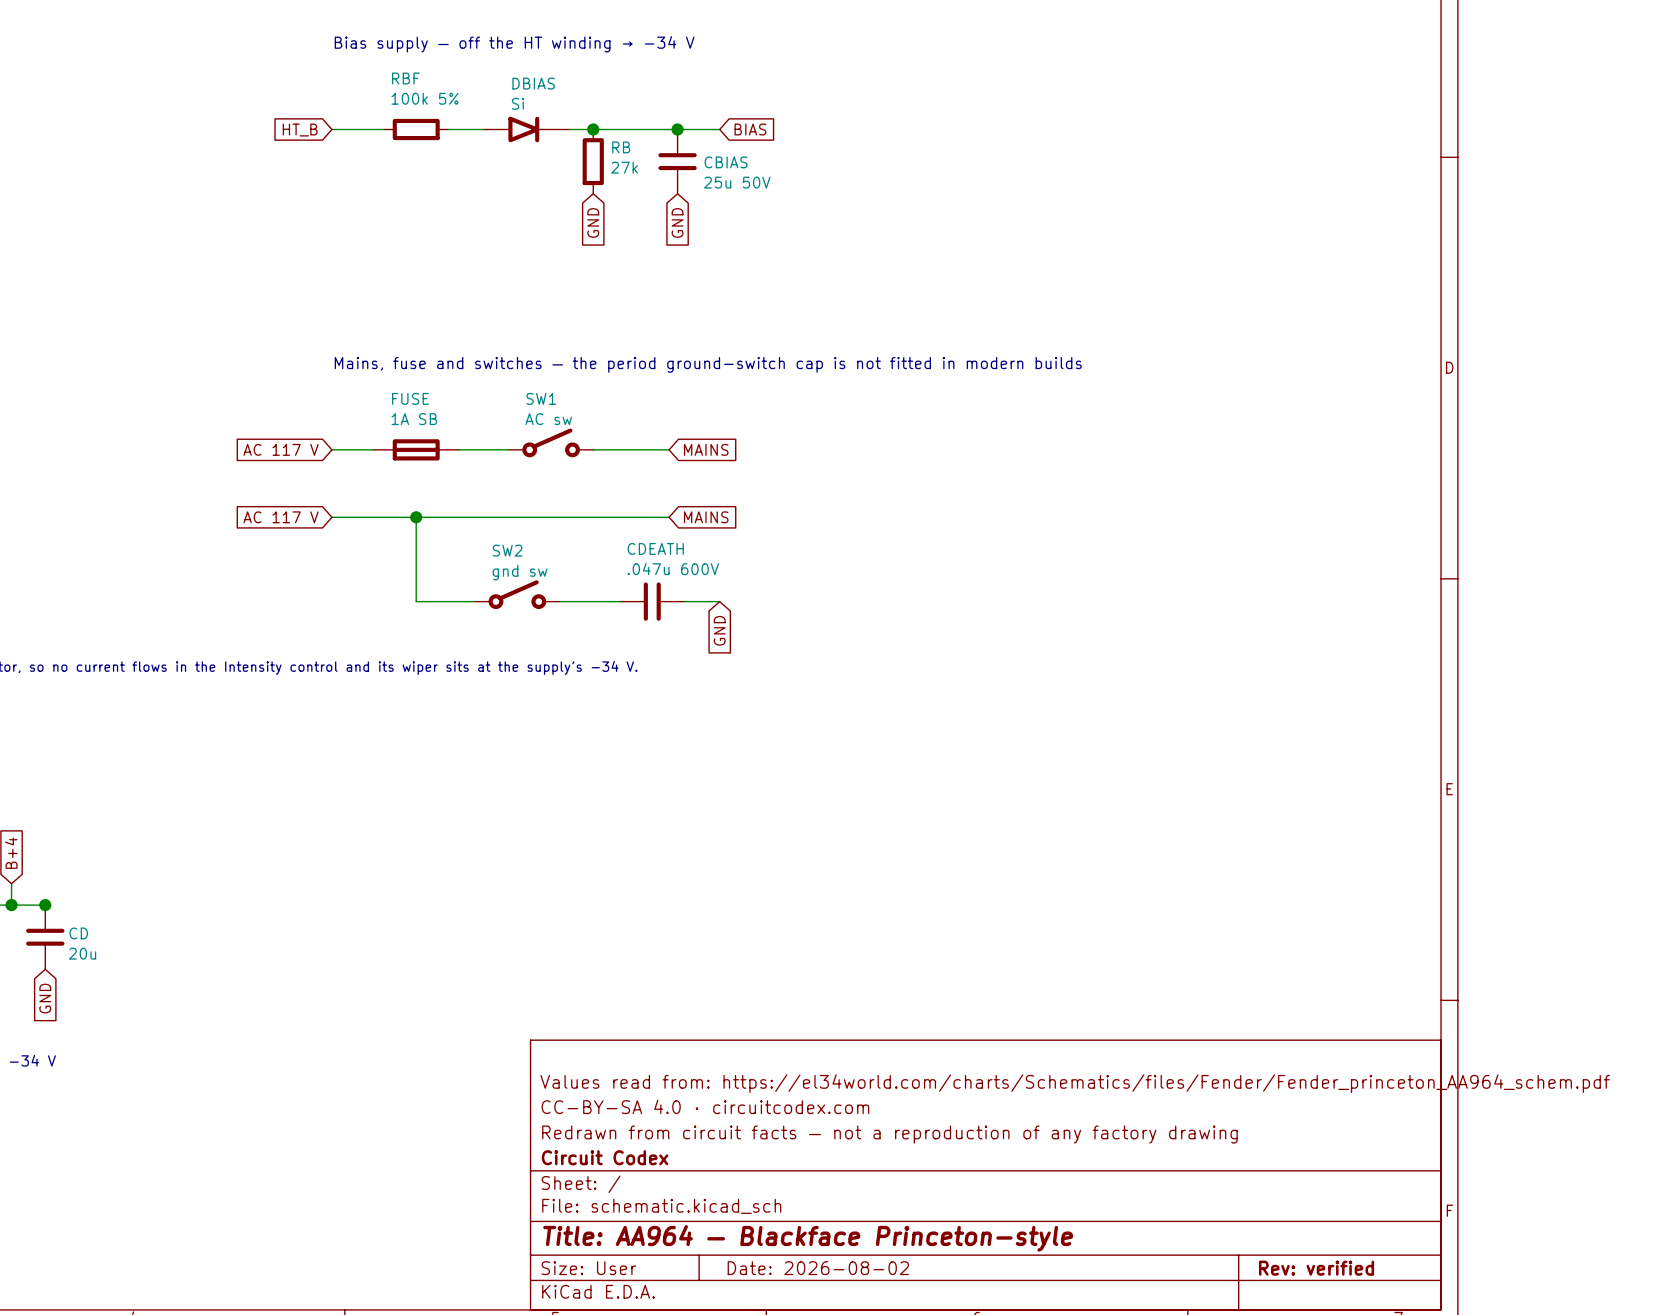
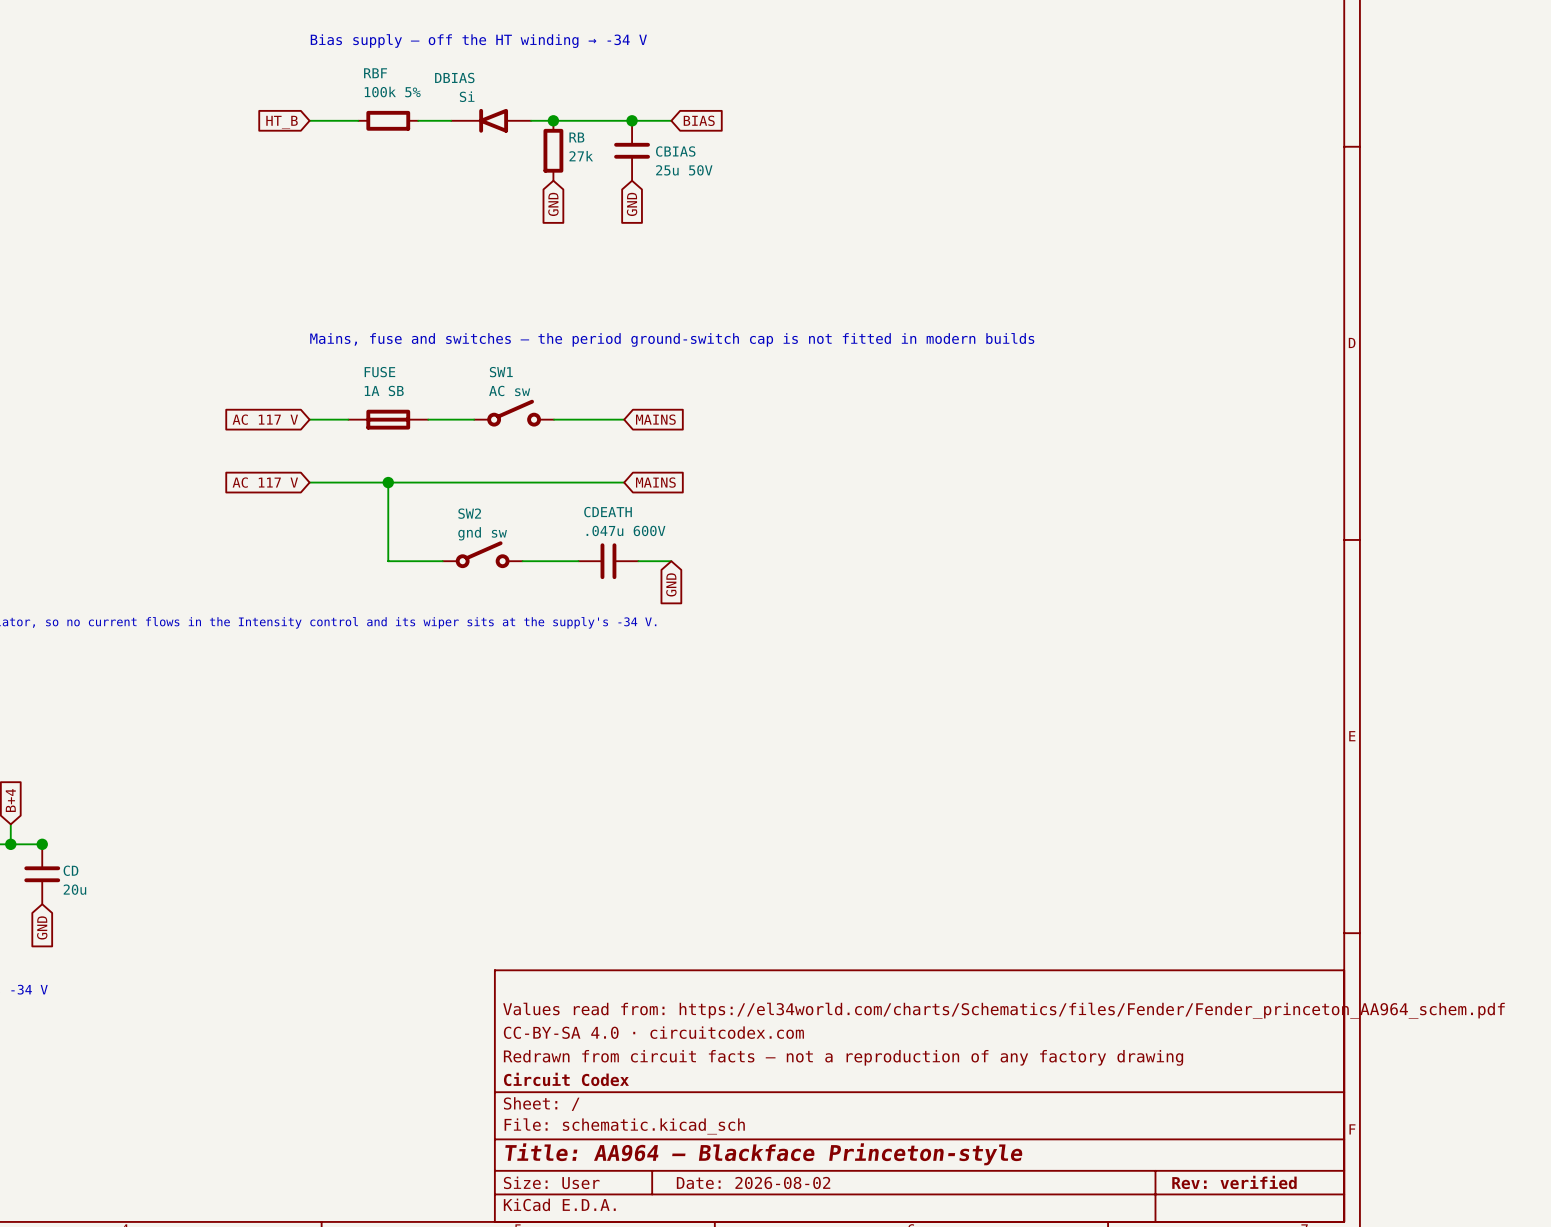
DBIAS name position: DBIAS (533, 83) -> DBIAS (454, 77)
DBIAS value position: Si (518, 103) -> Si (467, 96)
DBIAS rotation: 0° (523, 129) -> 180° (493, 120)

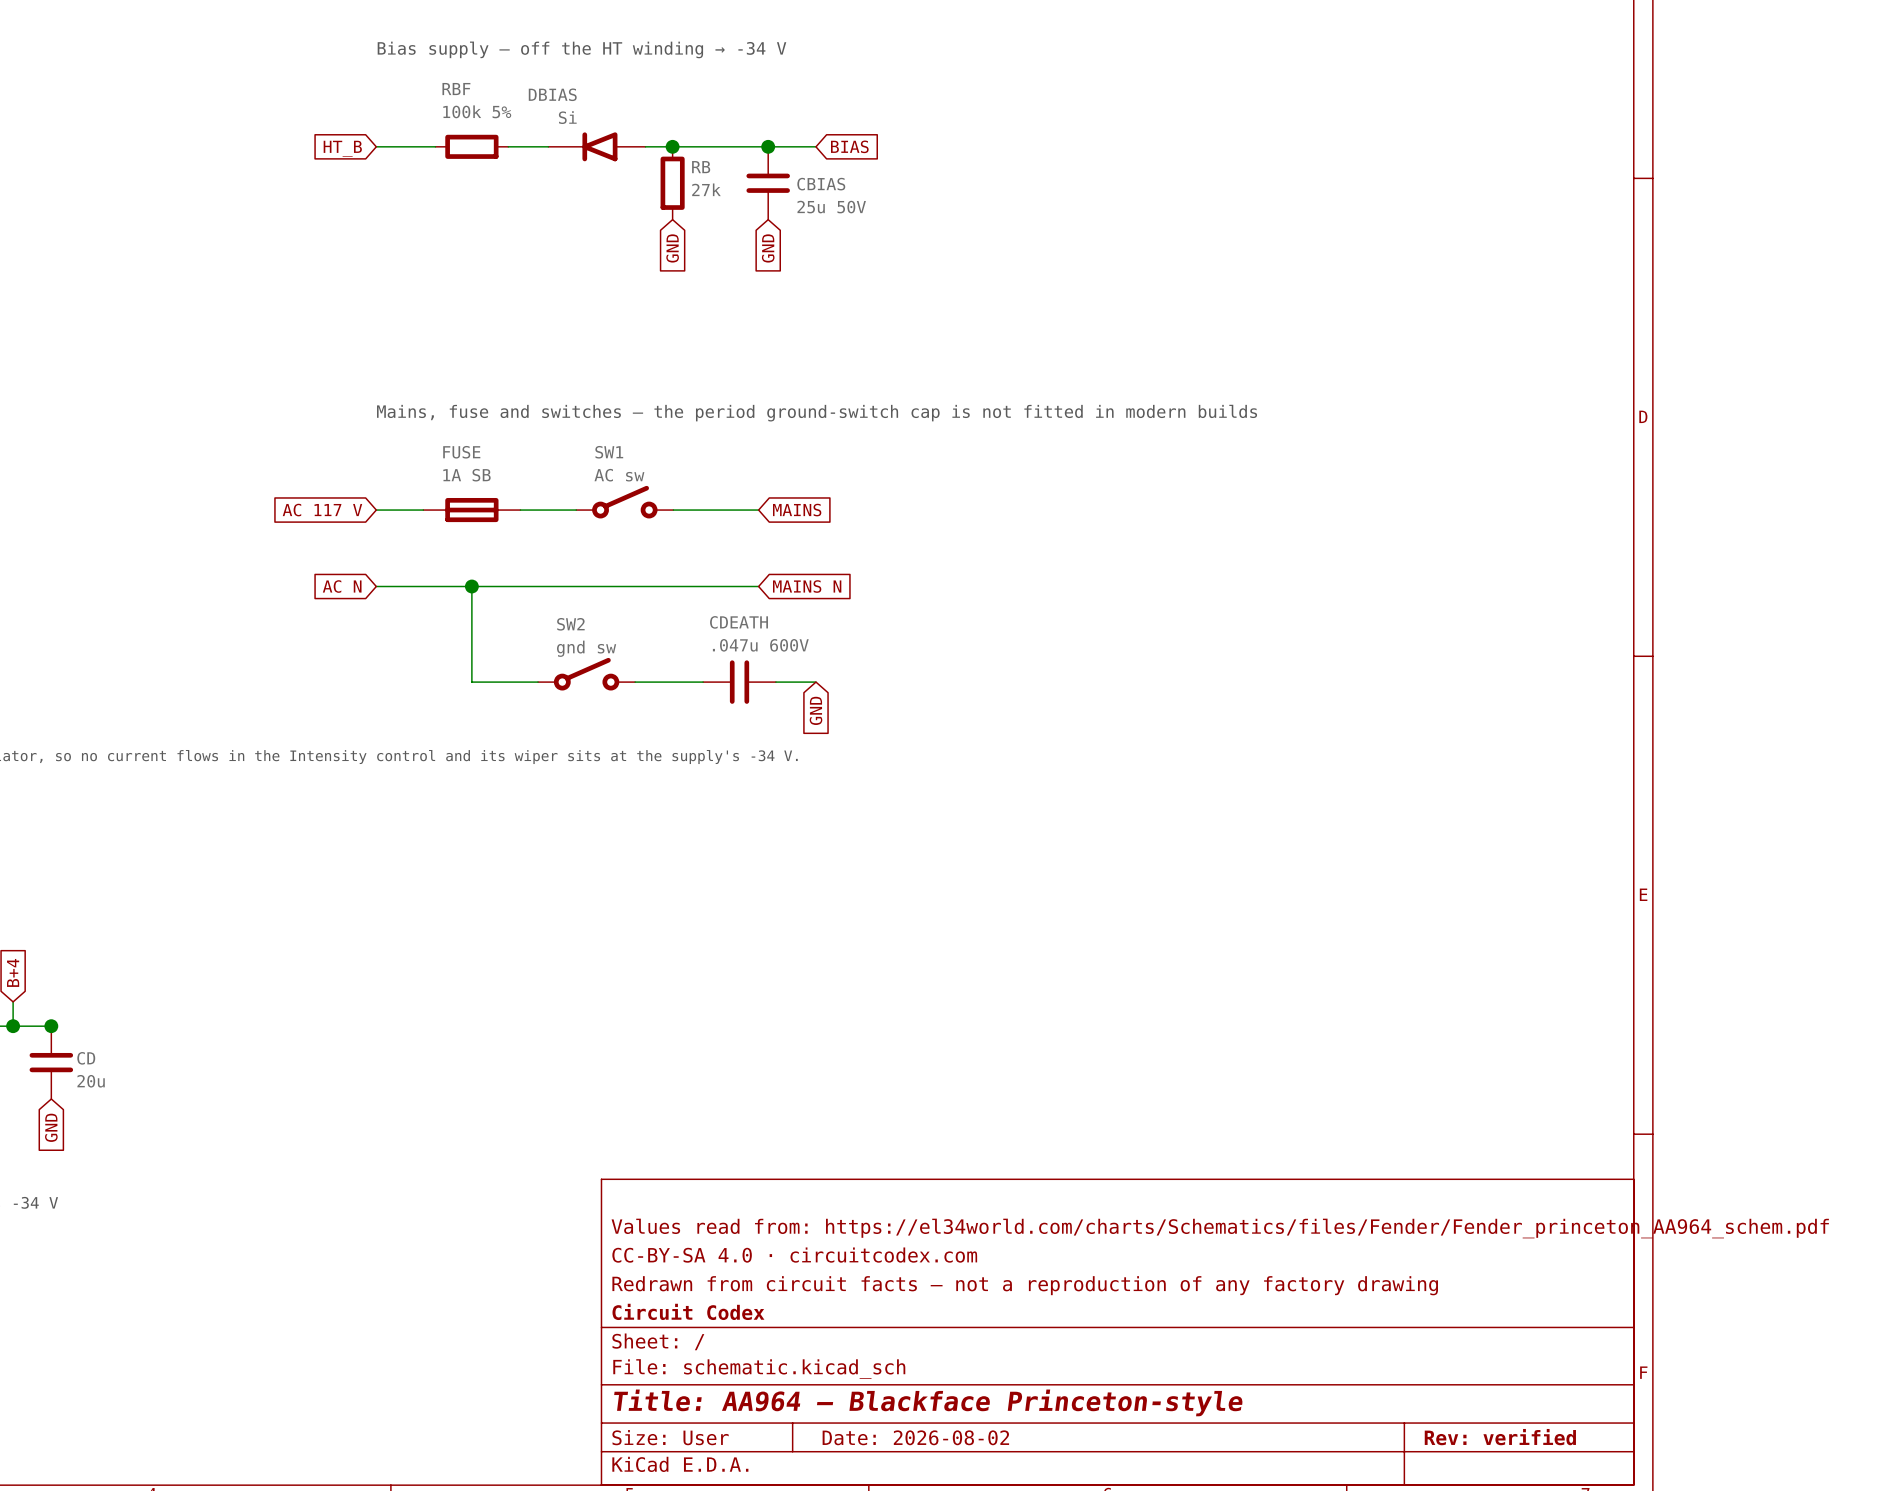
global label: AC 117 V (265, 482) -> AC N (342, 586)
global label: MAINS (655, 482) -> MAINS N (807, 586)

